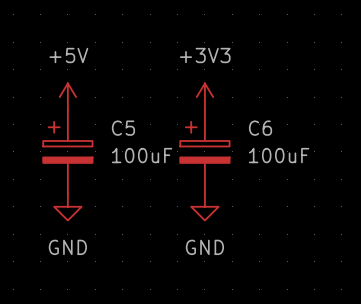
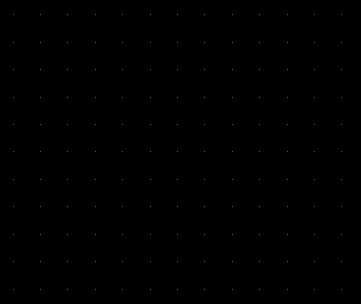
power symbol: +5V (67, 97) -> none
power symbol: +3V3 (204, 97) -> none
C5: 100uF (67, 151) -> none
C6: 100uF (204, 151) -> none
power symbol: GND (67, 206) -> none
power symbol: GND (204, 206) -> none

